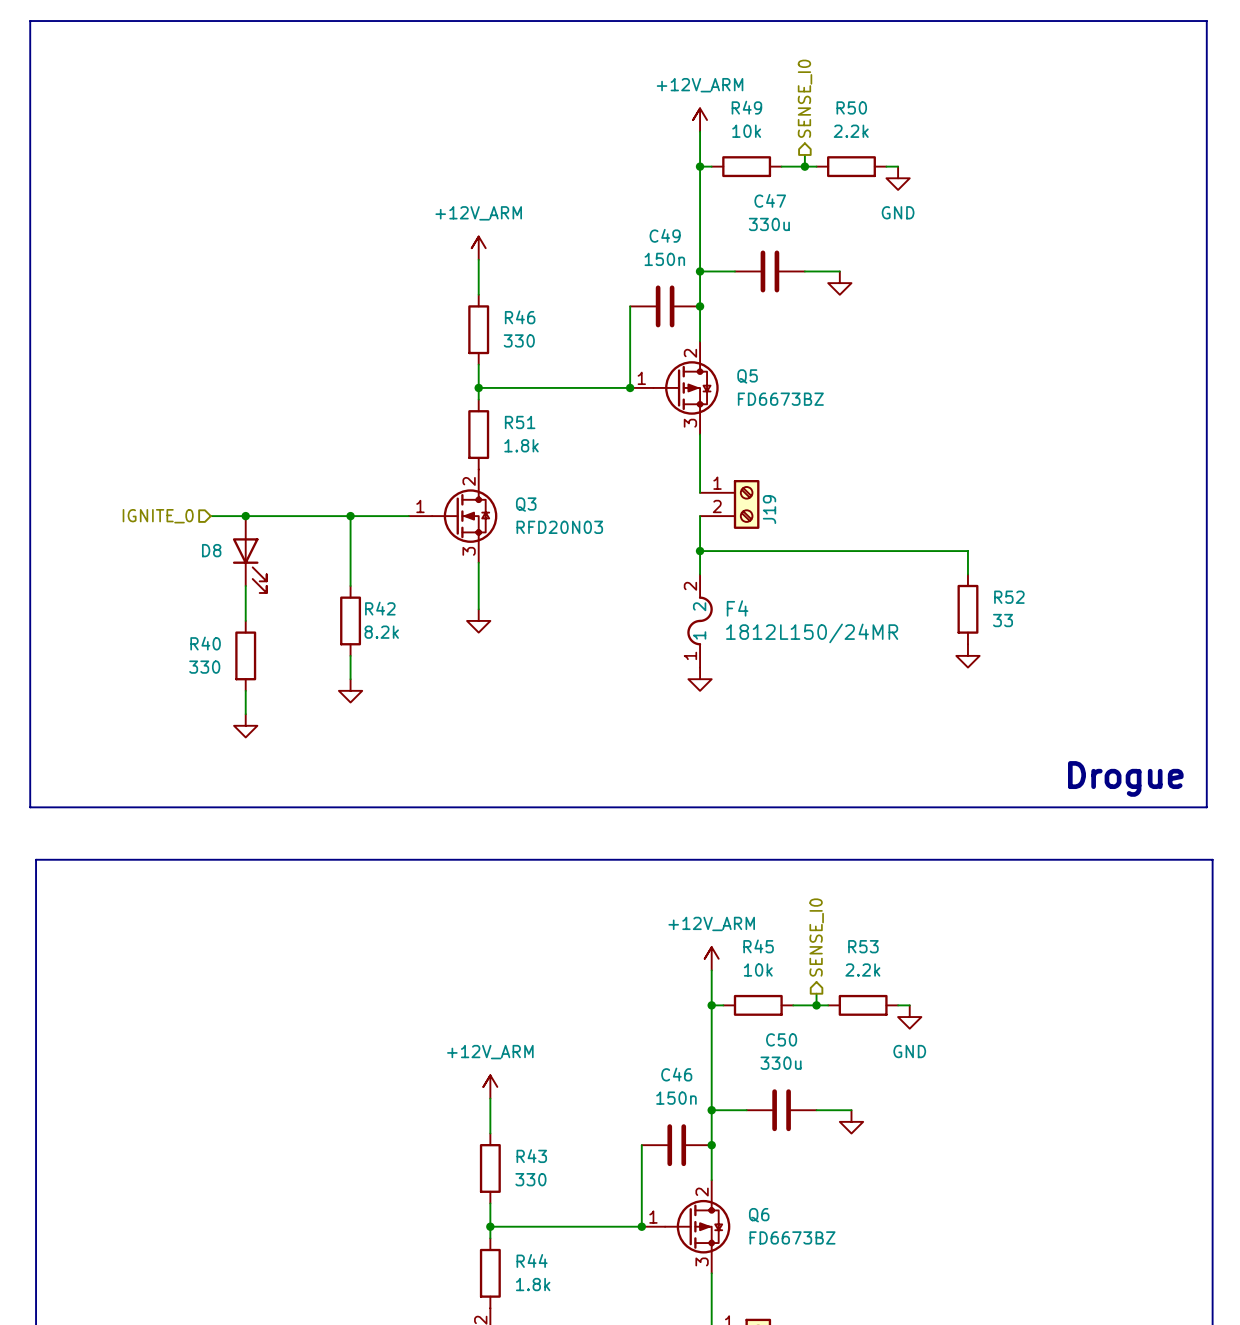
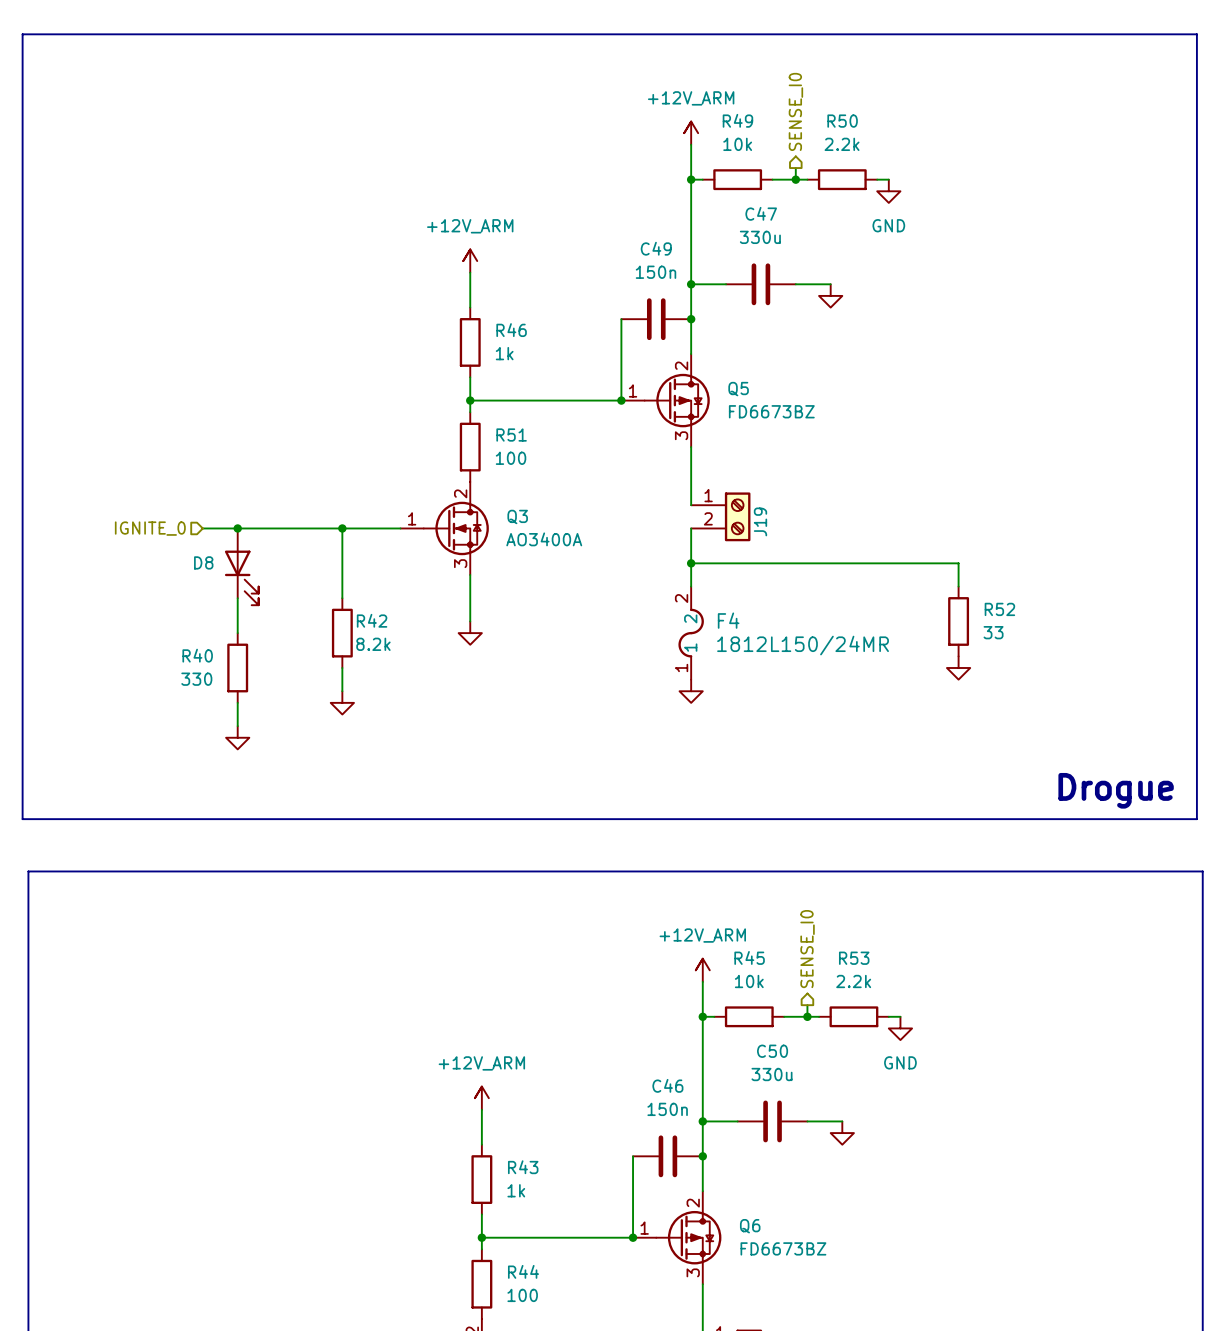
R46 value: 330 (519, 340) -> 1k (504, 353)
R51 value: 1.8k (521, 445) -> 100 (511, 458)
Q3 value: RFD20N03 (559, 527) -> AO3400A (544, 539)
R43 value: 330 (530, 1179) -> 1k (516, 1190)
R44 value: 1.8k (533, 1284) -> 100 (522, 1295)

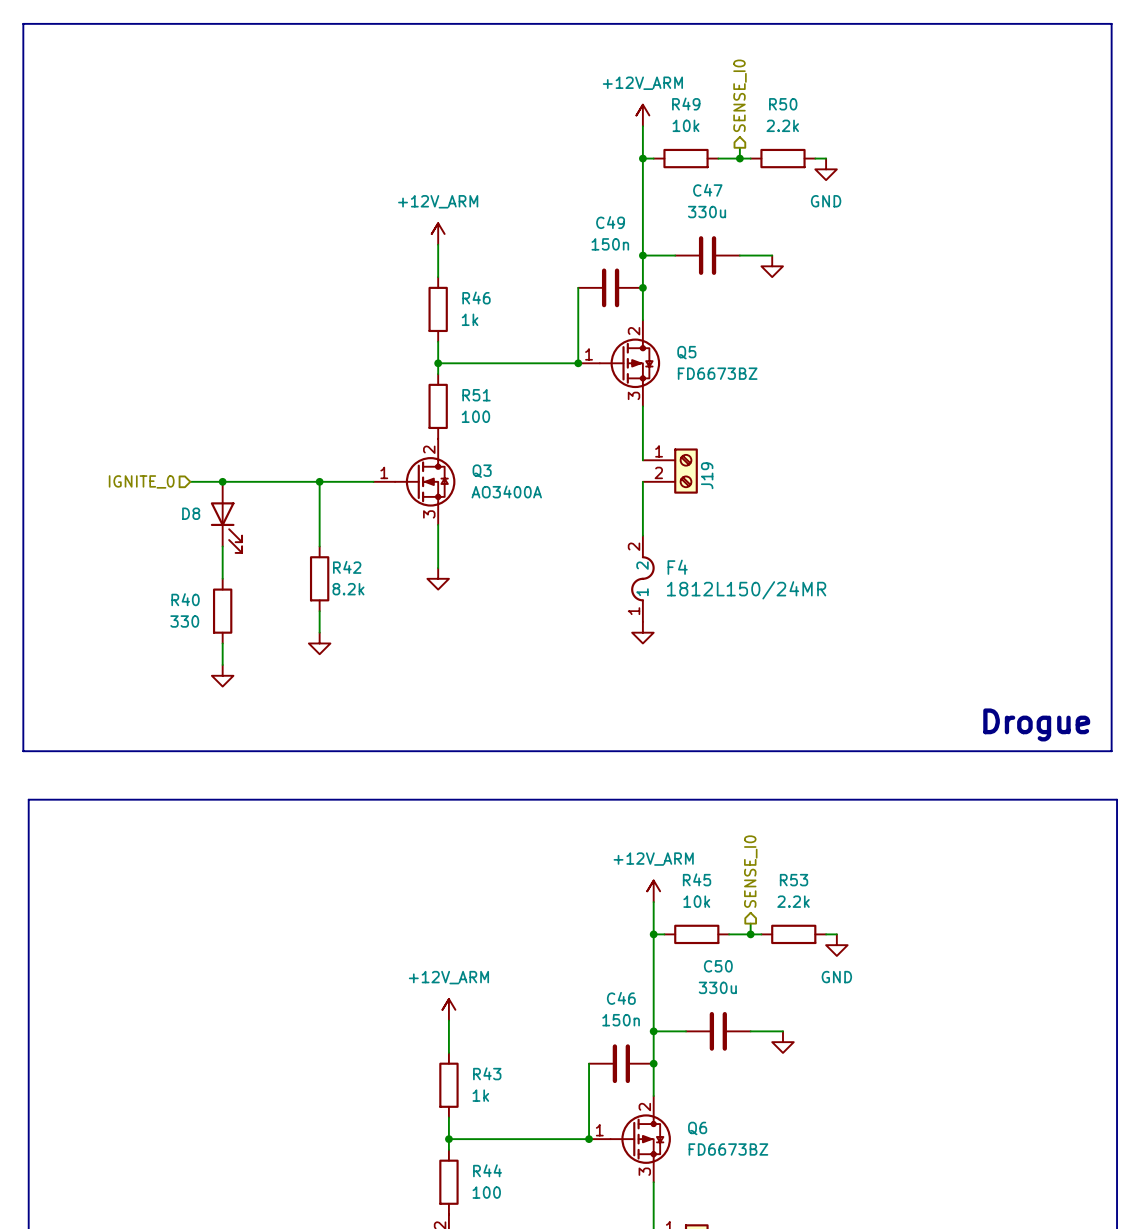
wire: (691, 563) (958, 563) (958, 586) -> none
junction: (691, 563) -> none
R52: 33 (958, 621) -> none
power symbol: (958, 667) -> none

